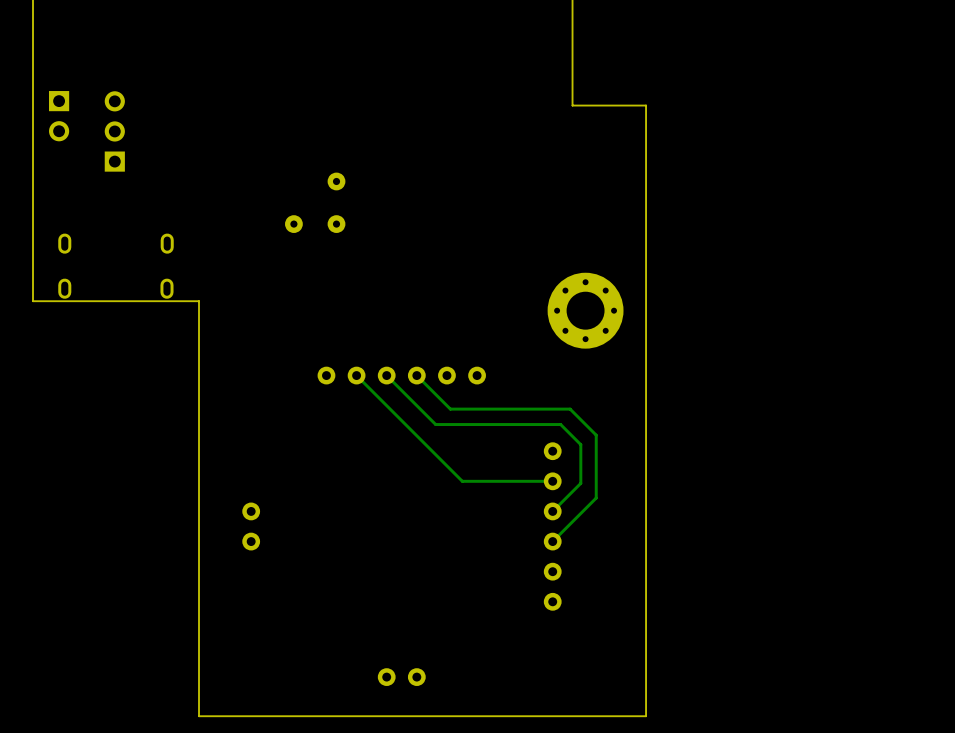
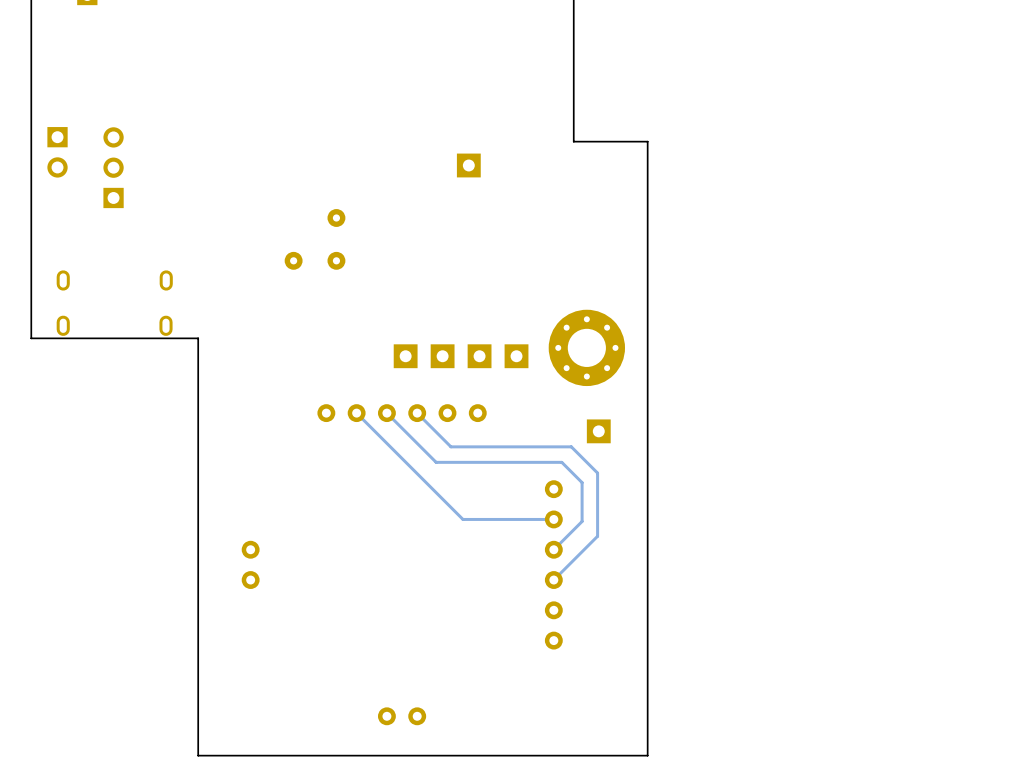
part: none -> (468, 165)
part: none -> (405, 356)
part: none -> (442, 356)
part: none -> (479, 356)
part: none -> (516, 356)
part: none -> (598, 431)

